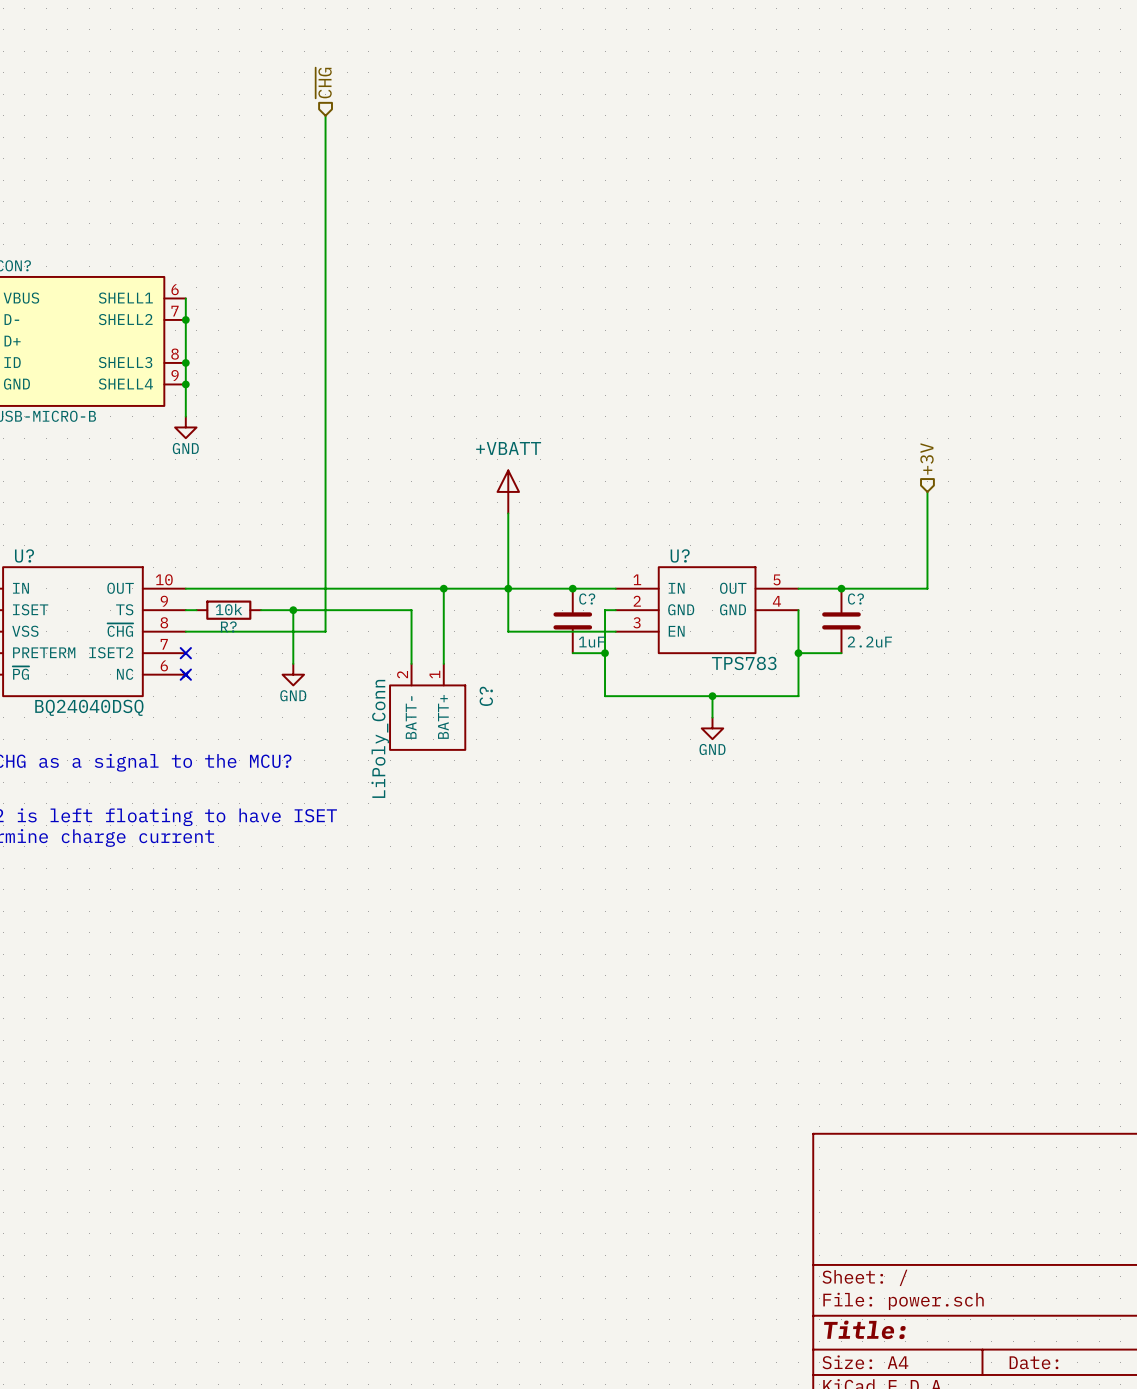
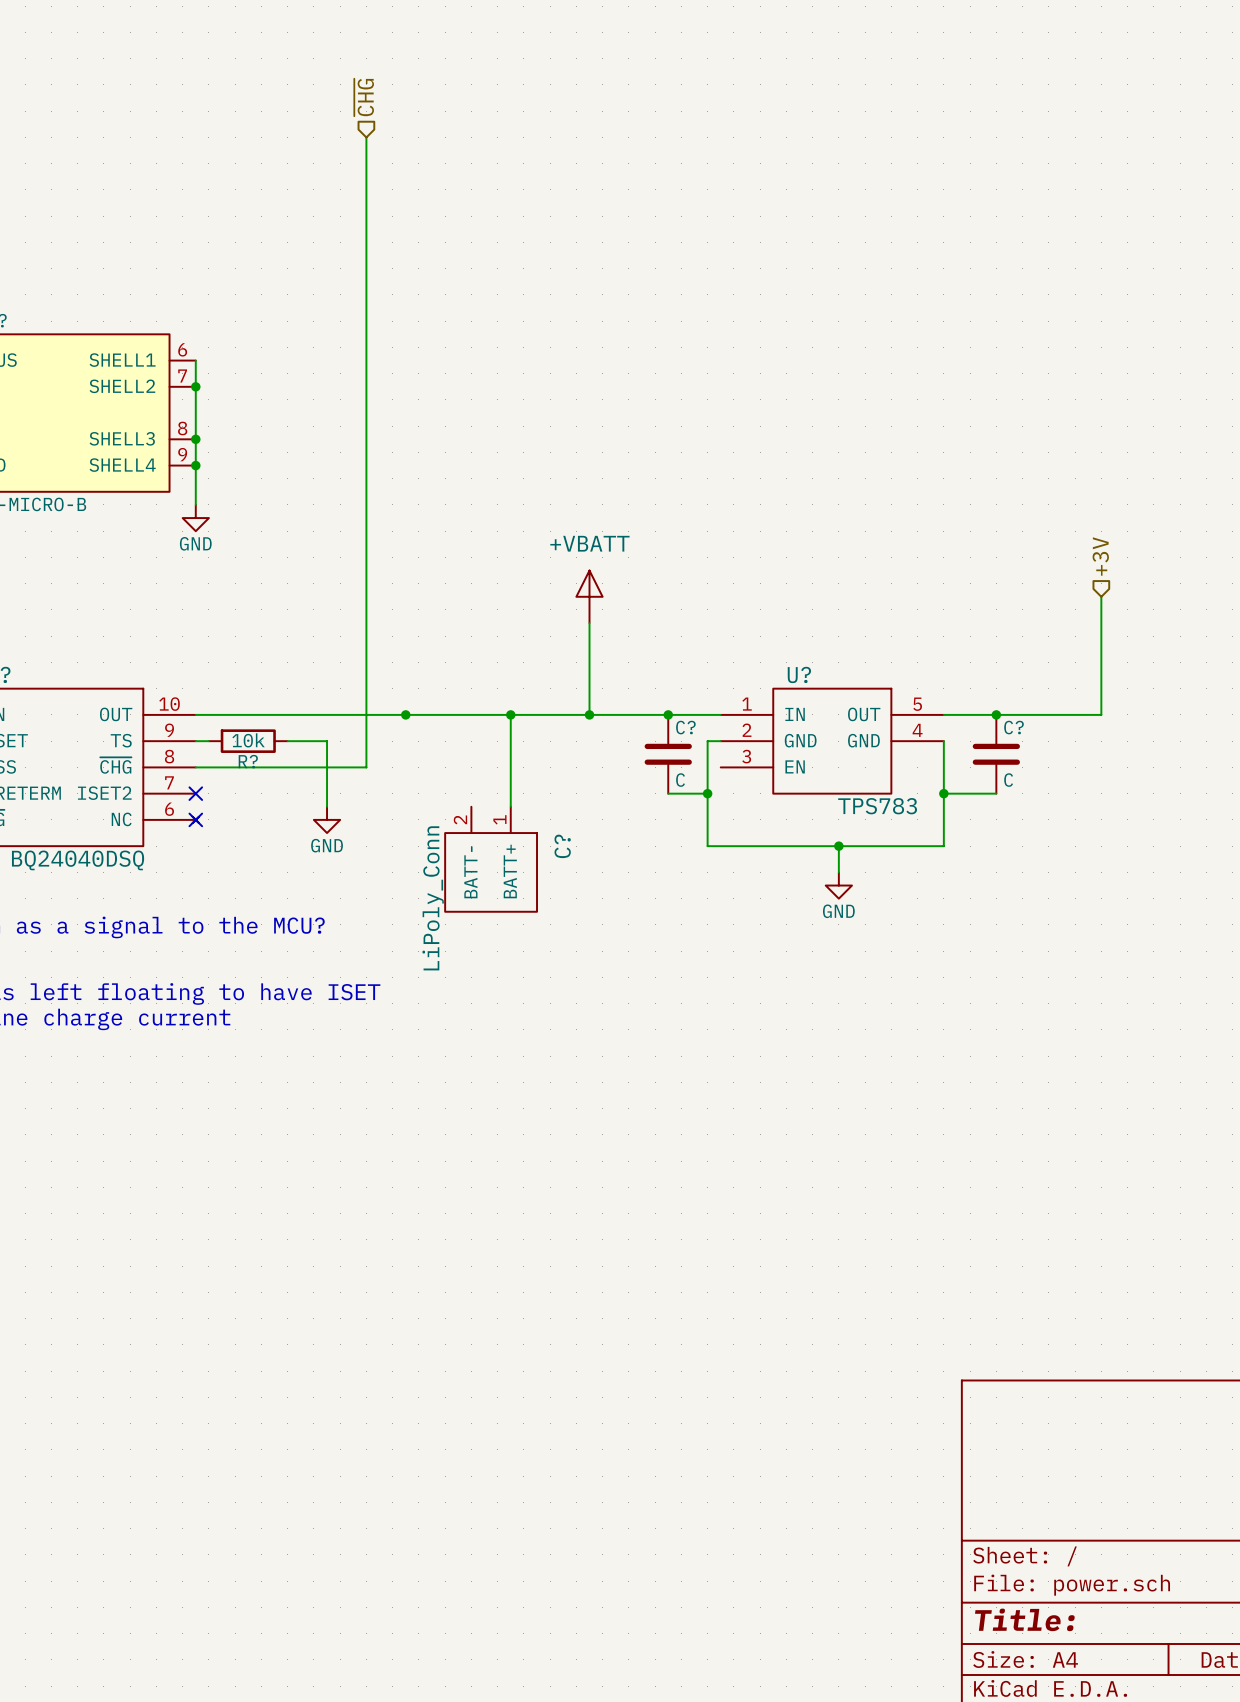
junction: none -> (405, 714)
wire: (508, 588) (508, 631) (615, 631) -> none
wire: (293, 610) (411, 610) (411, 663) -> none
junction: (293, 610) -> none
C? value: 1uF (591, 642) -> C (680, 780)
C? value: 2.2uF (869, 642) -> C (1008, 780)

